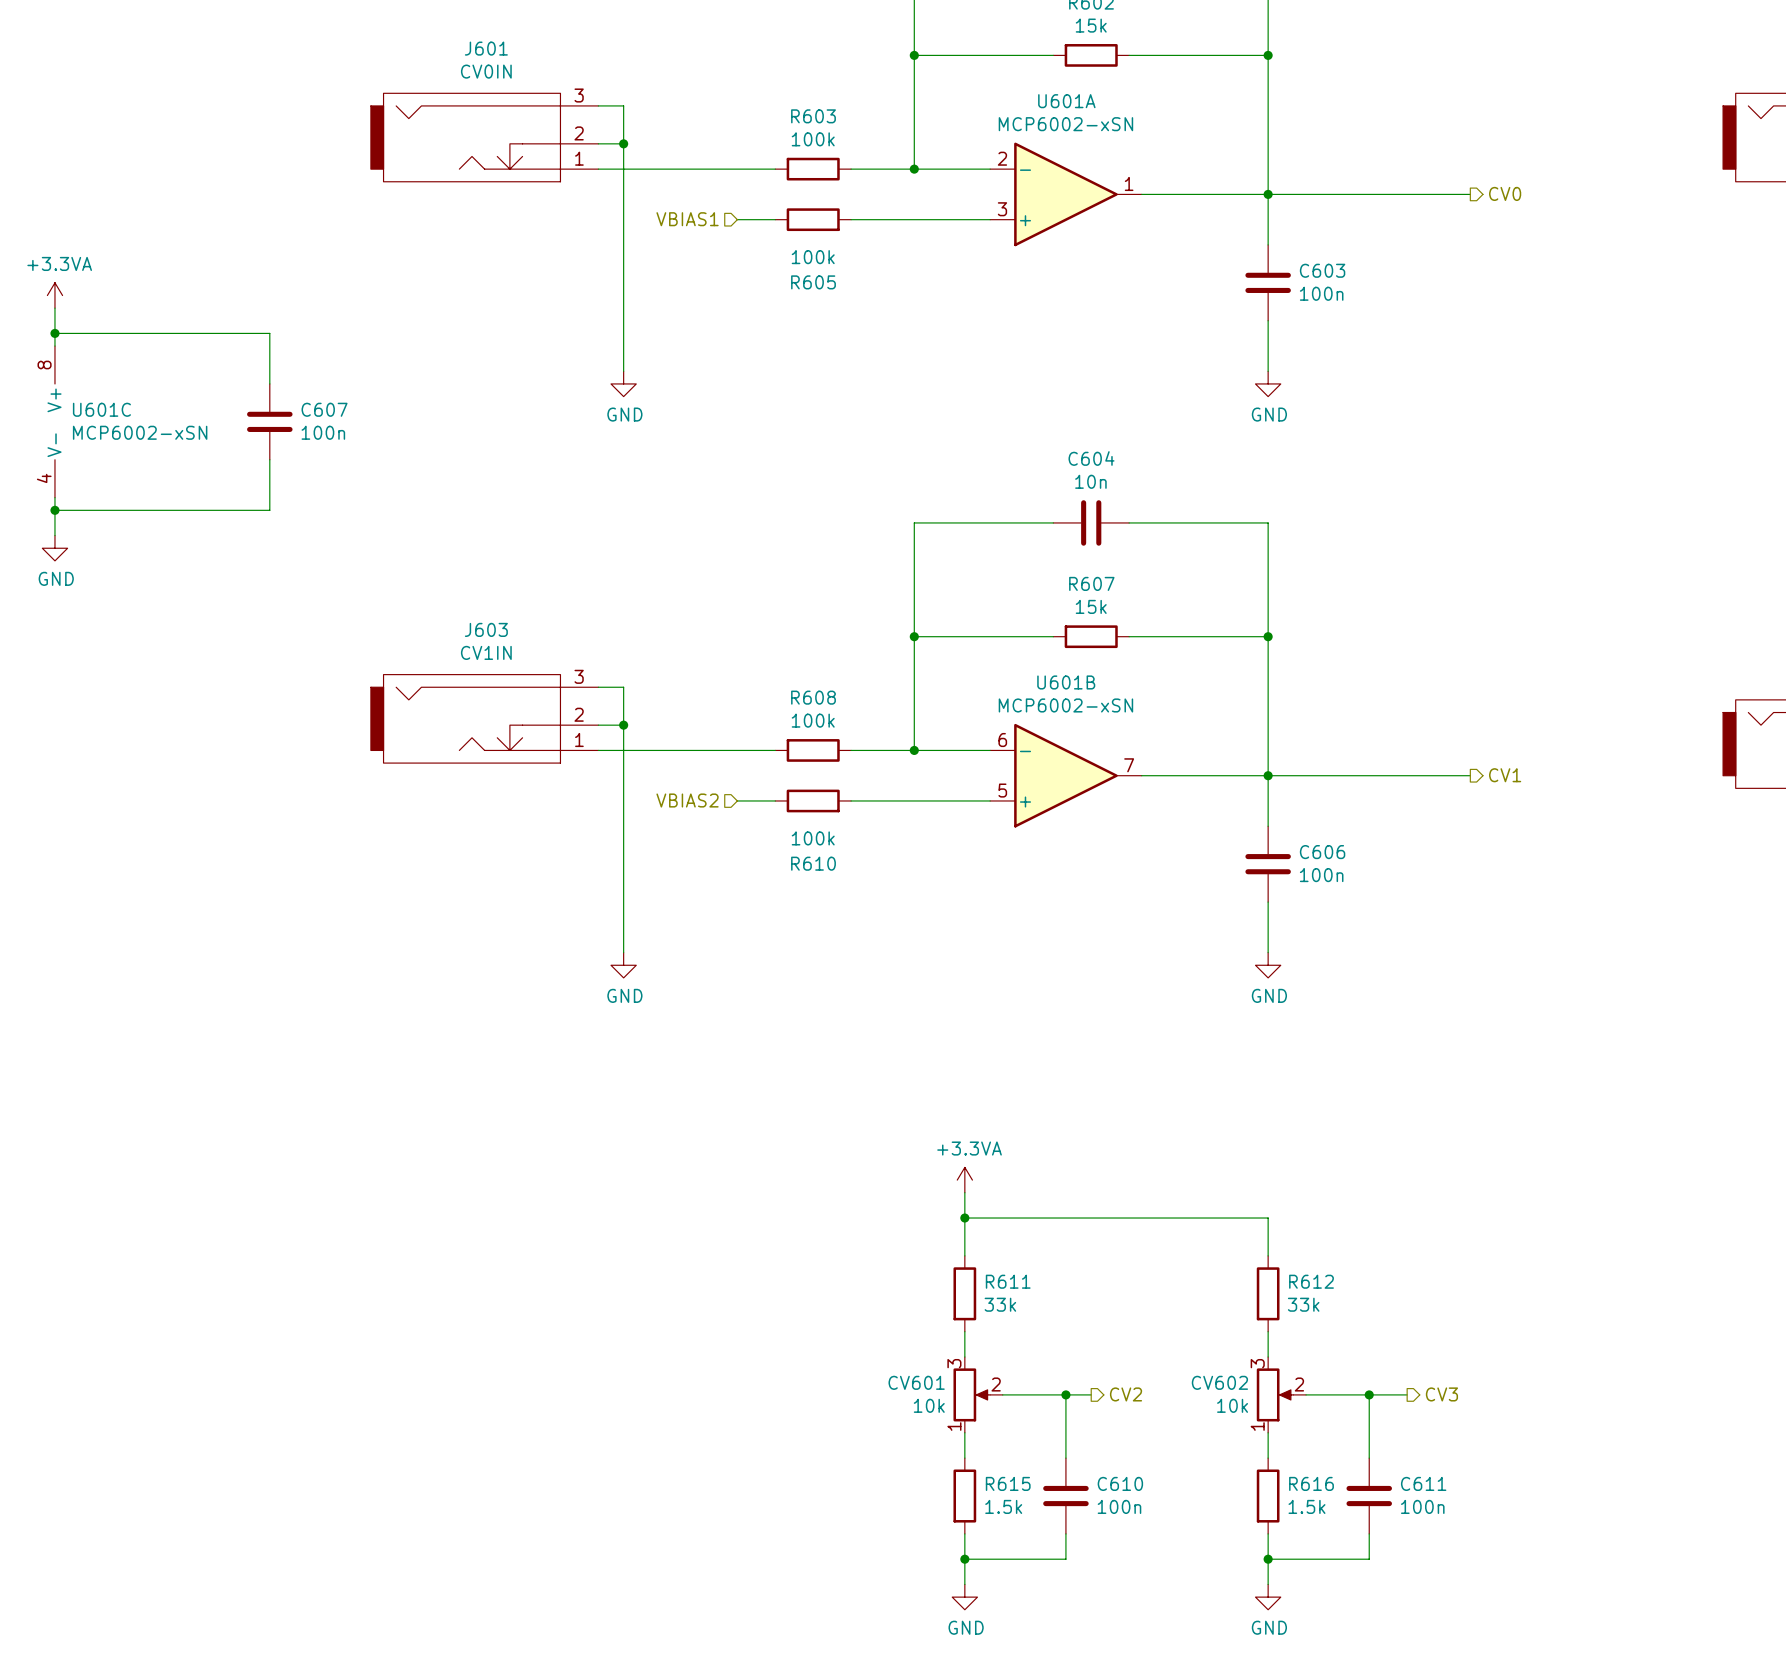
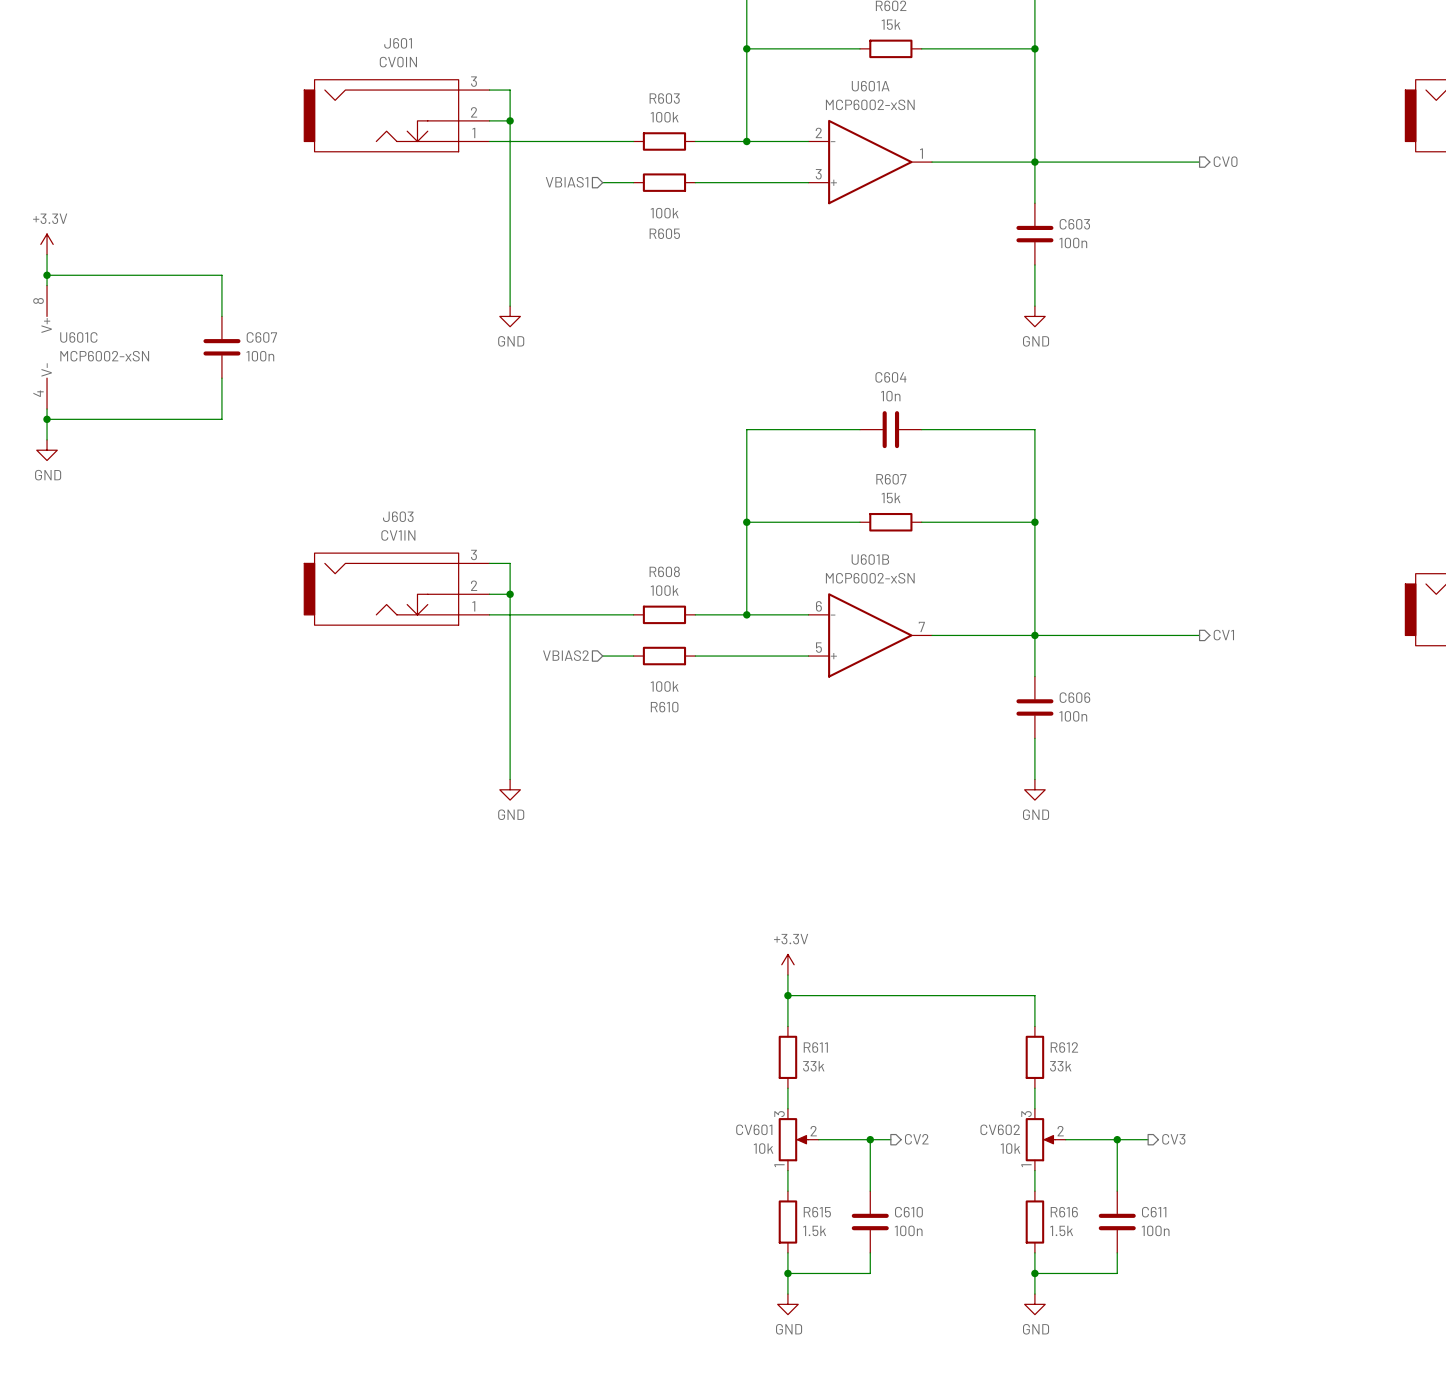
power symbol: +3.3VA (54, 295) -> +3.3V (47, 244)
power symbol: +3.3VA (964, 1180) -> +3.3V (787, 964)

